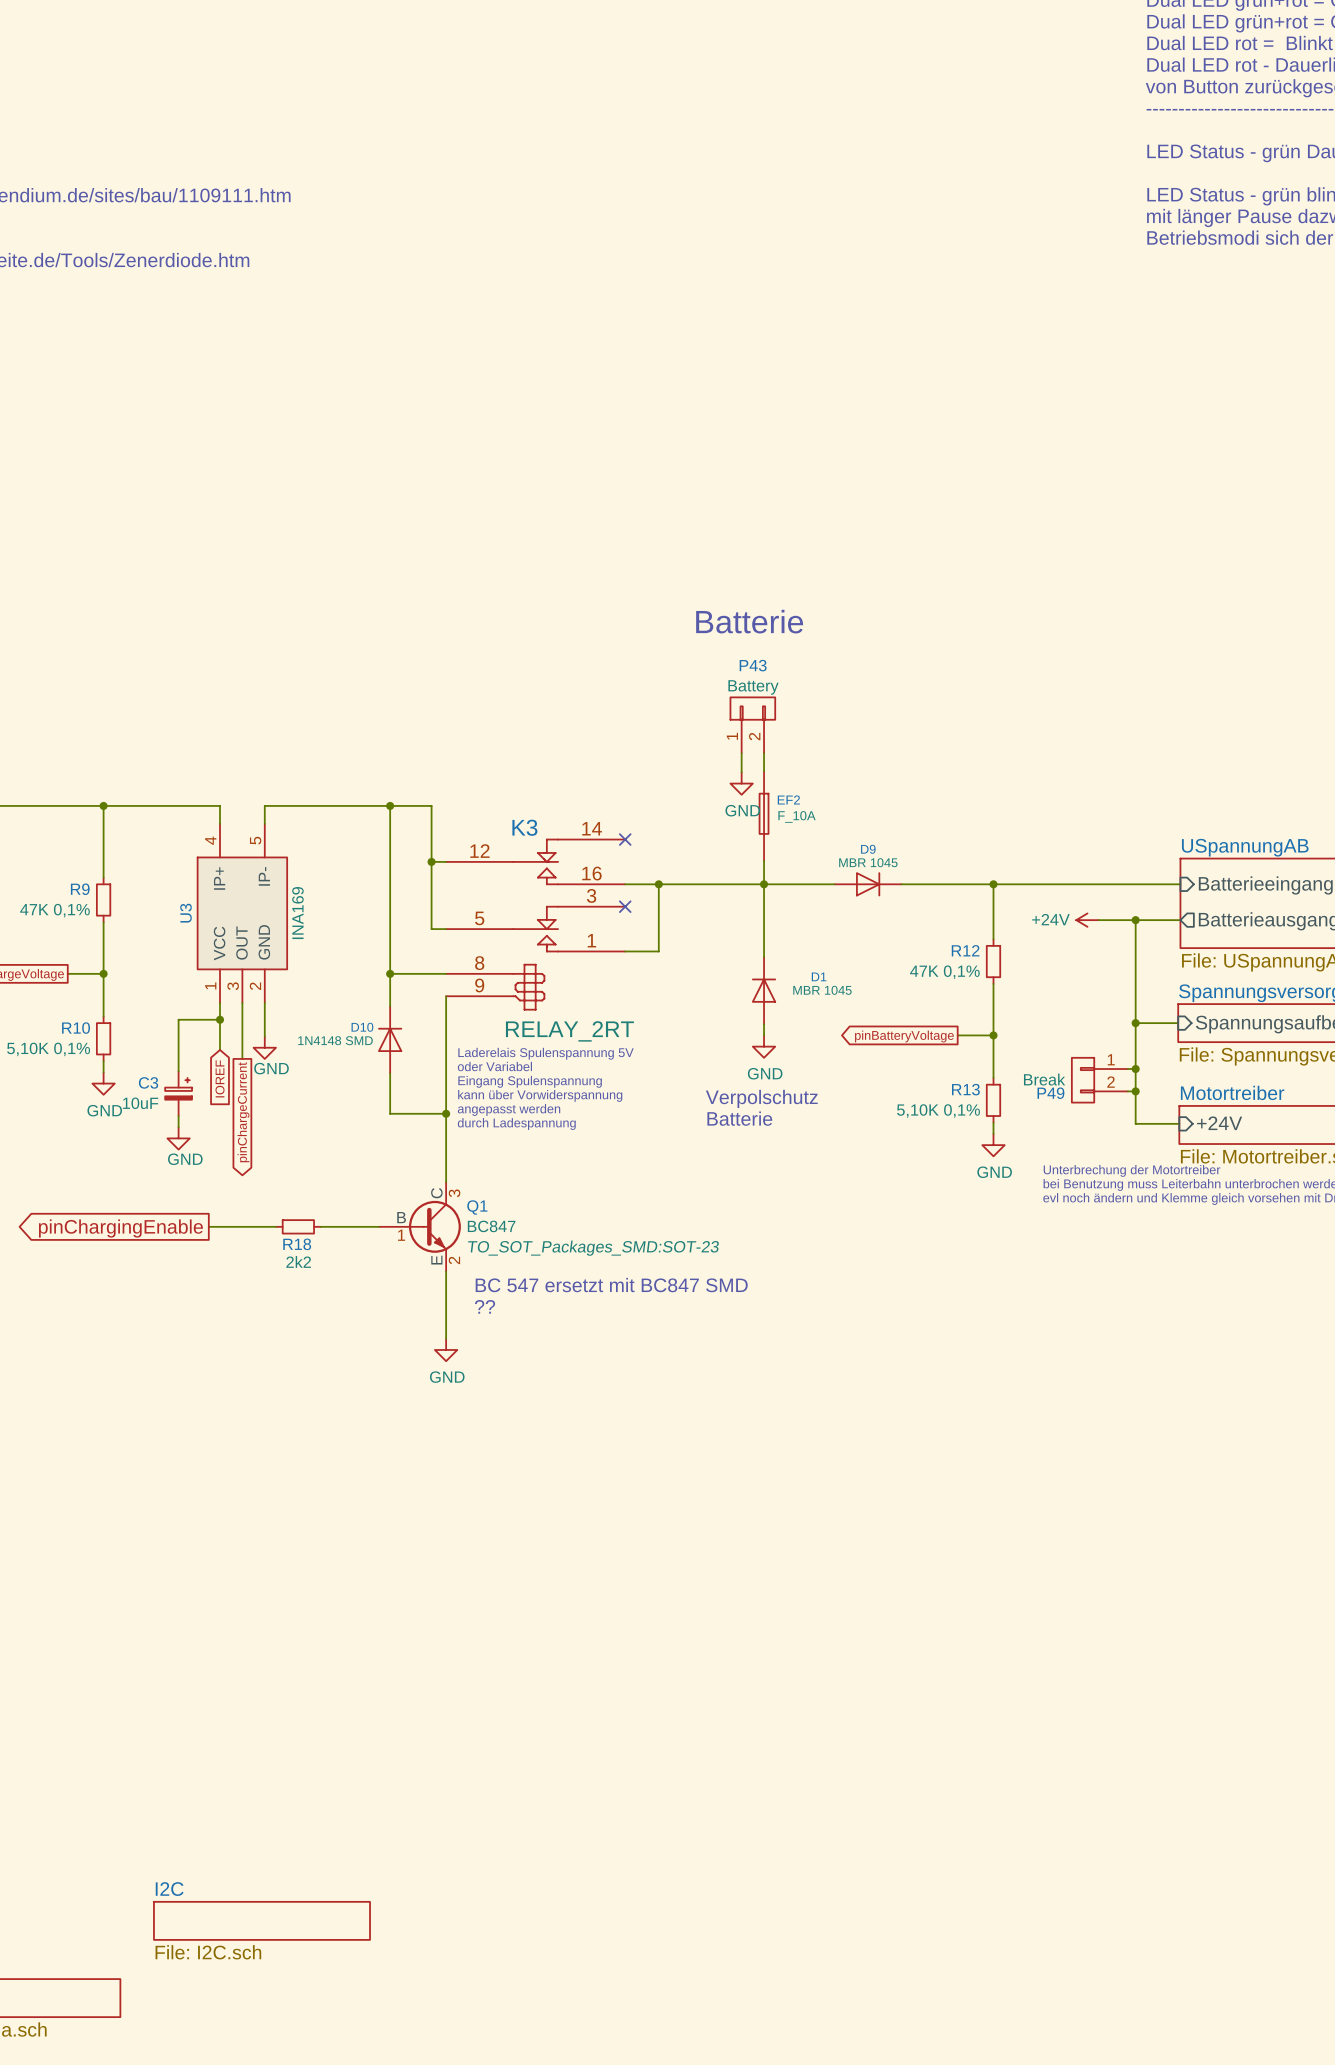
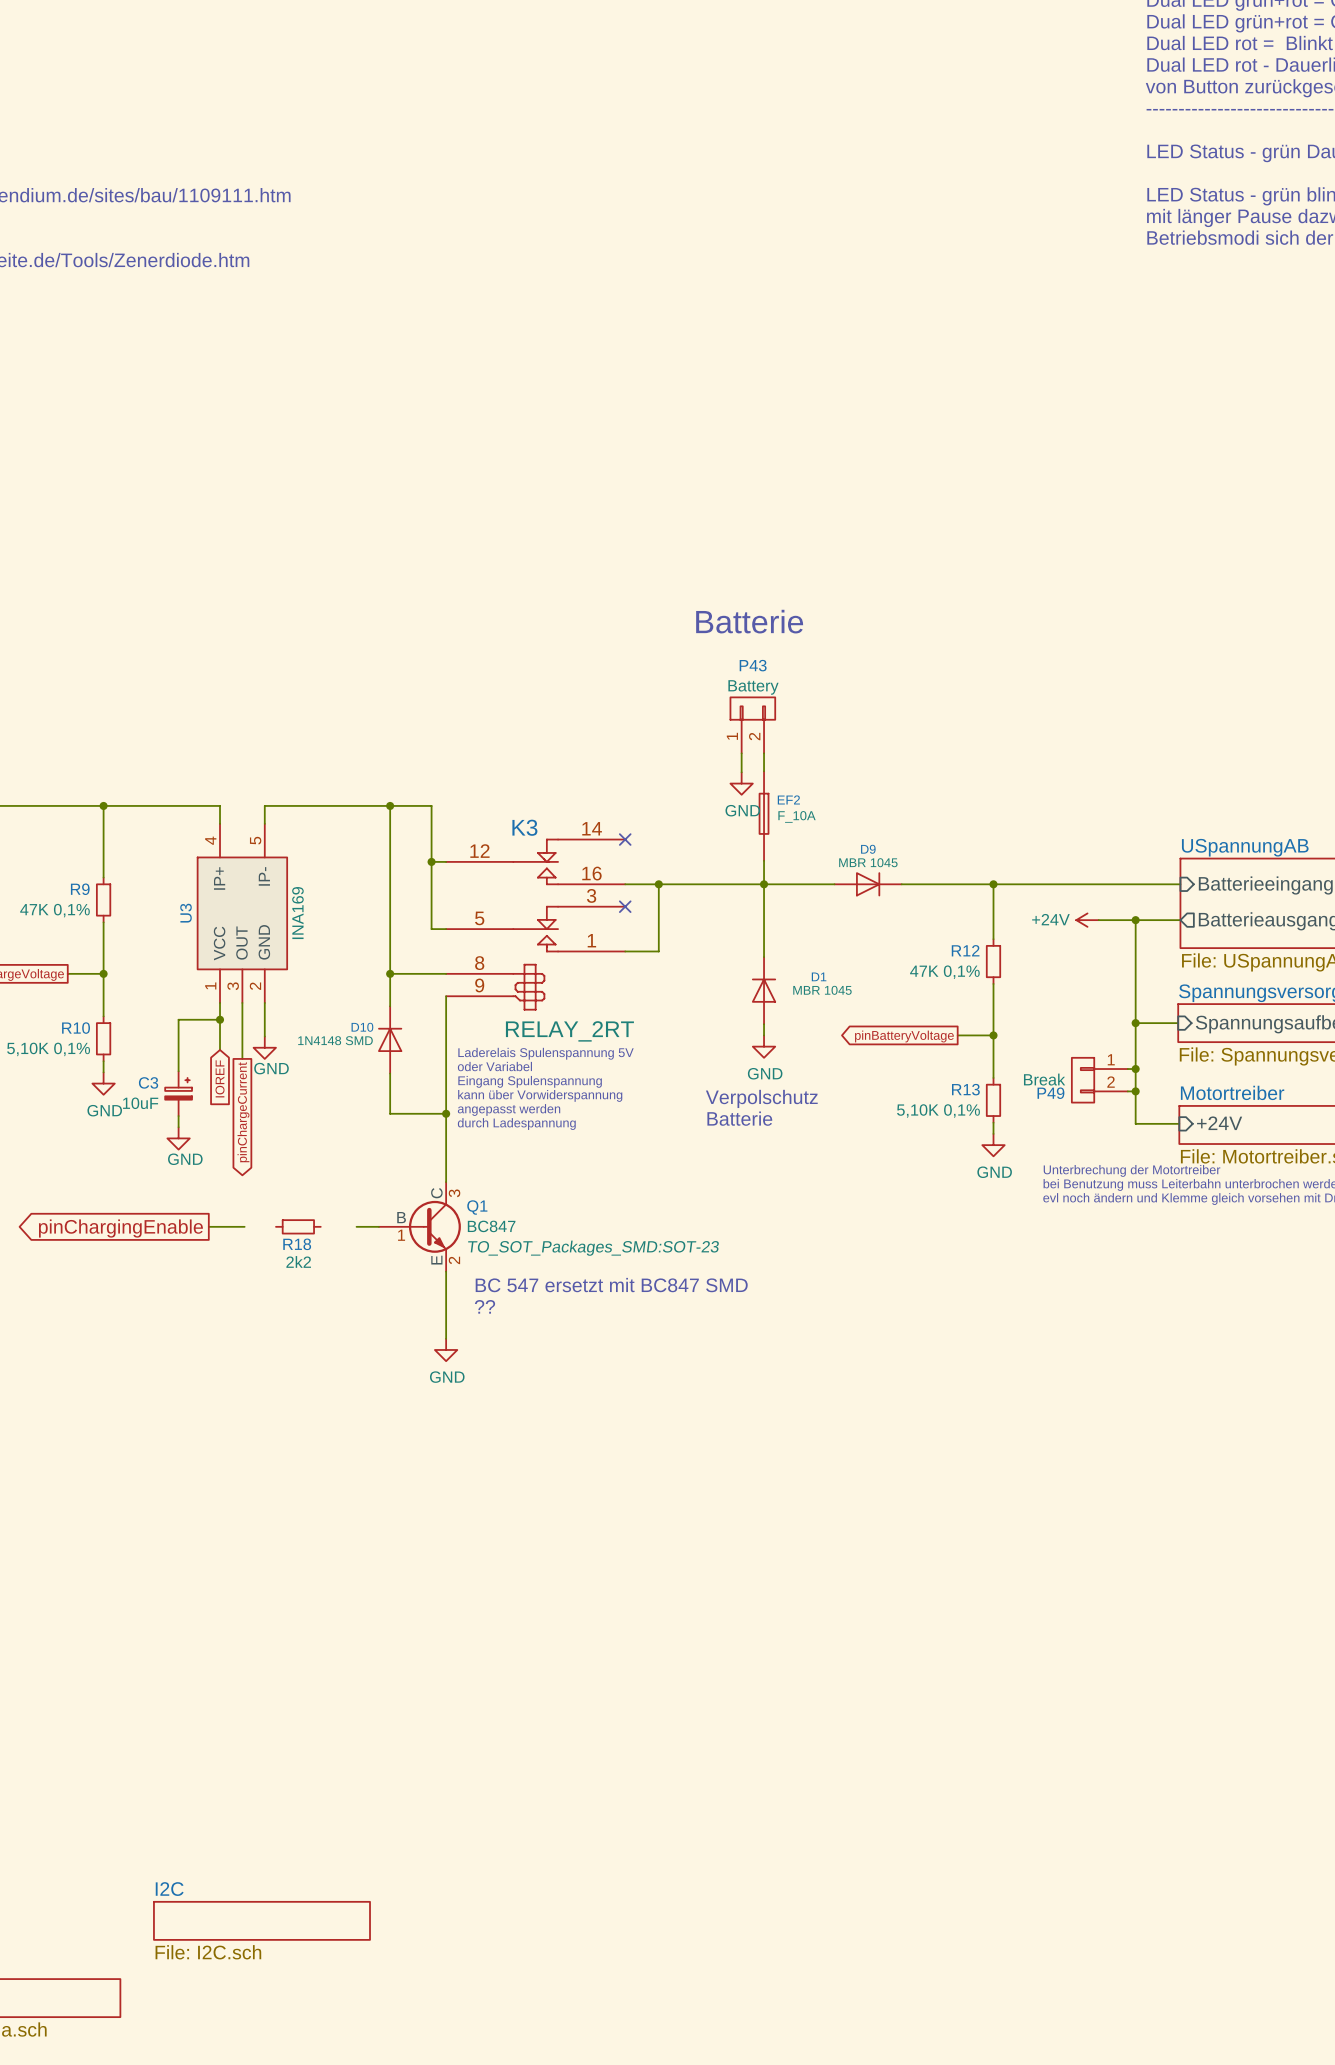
wire: (244, 1226) (275, 1226) -> none
wire: (320, 1226) (356, 1226) -> none

